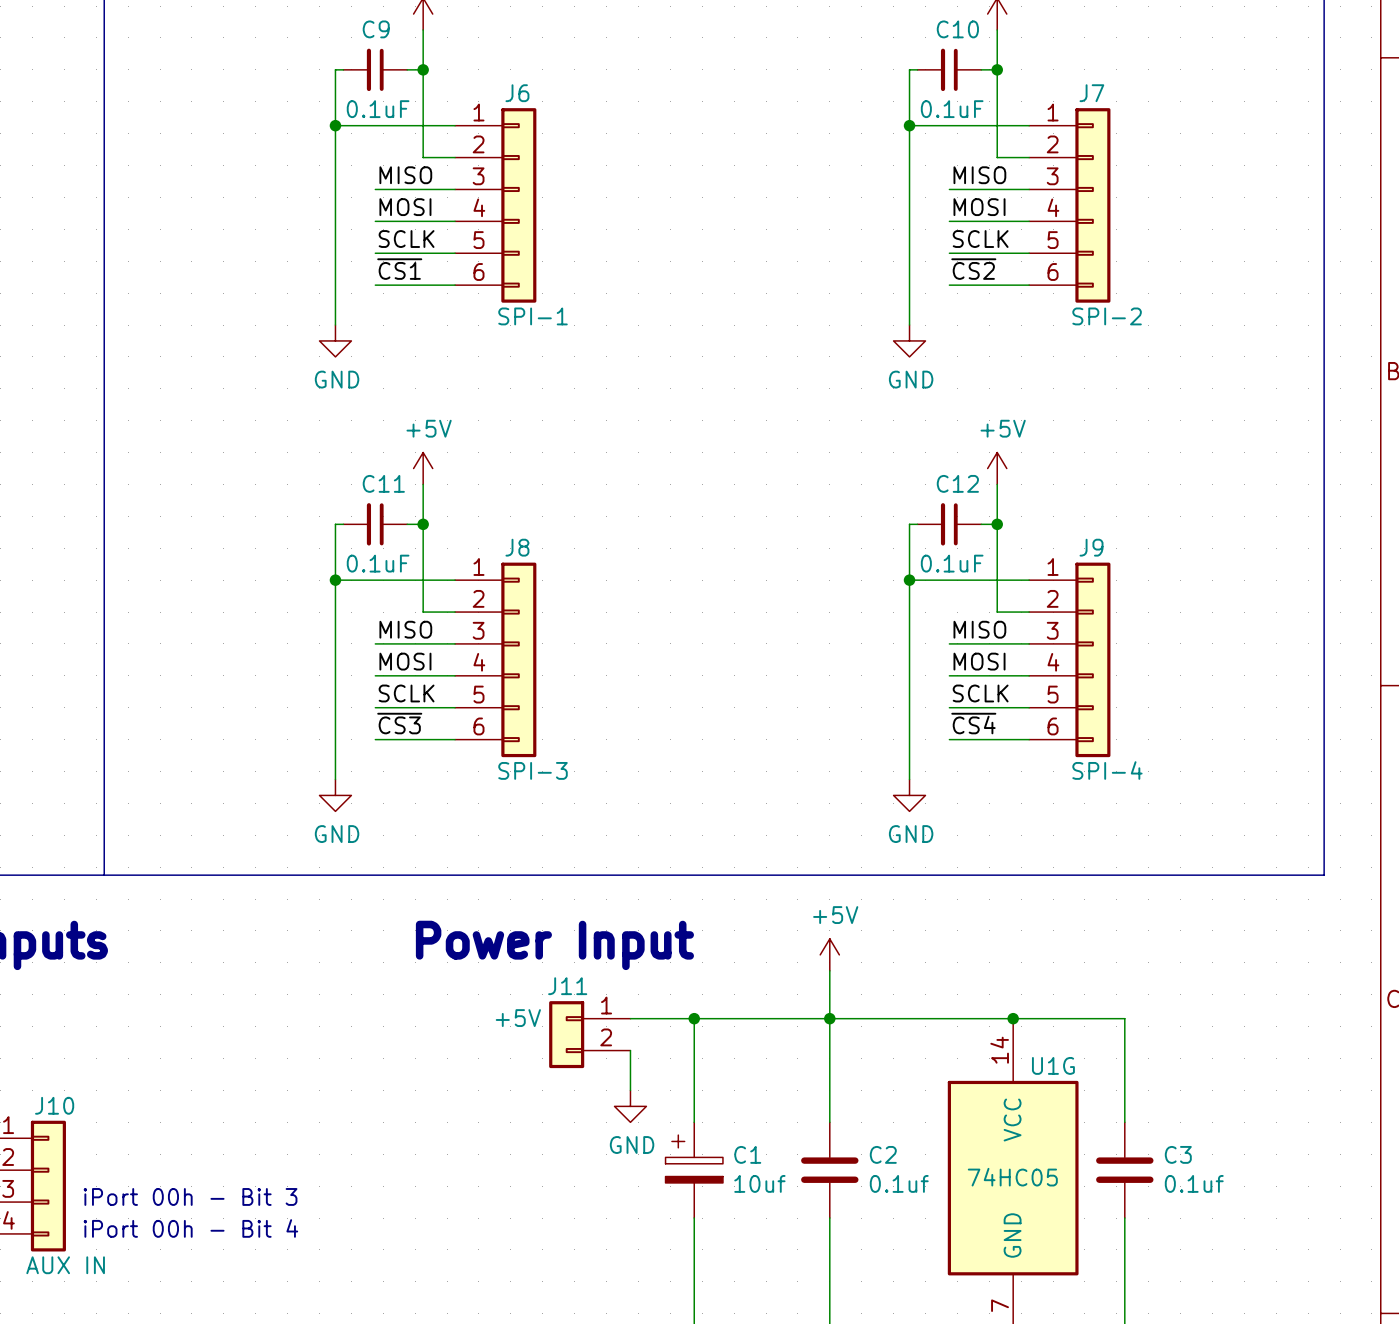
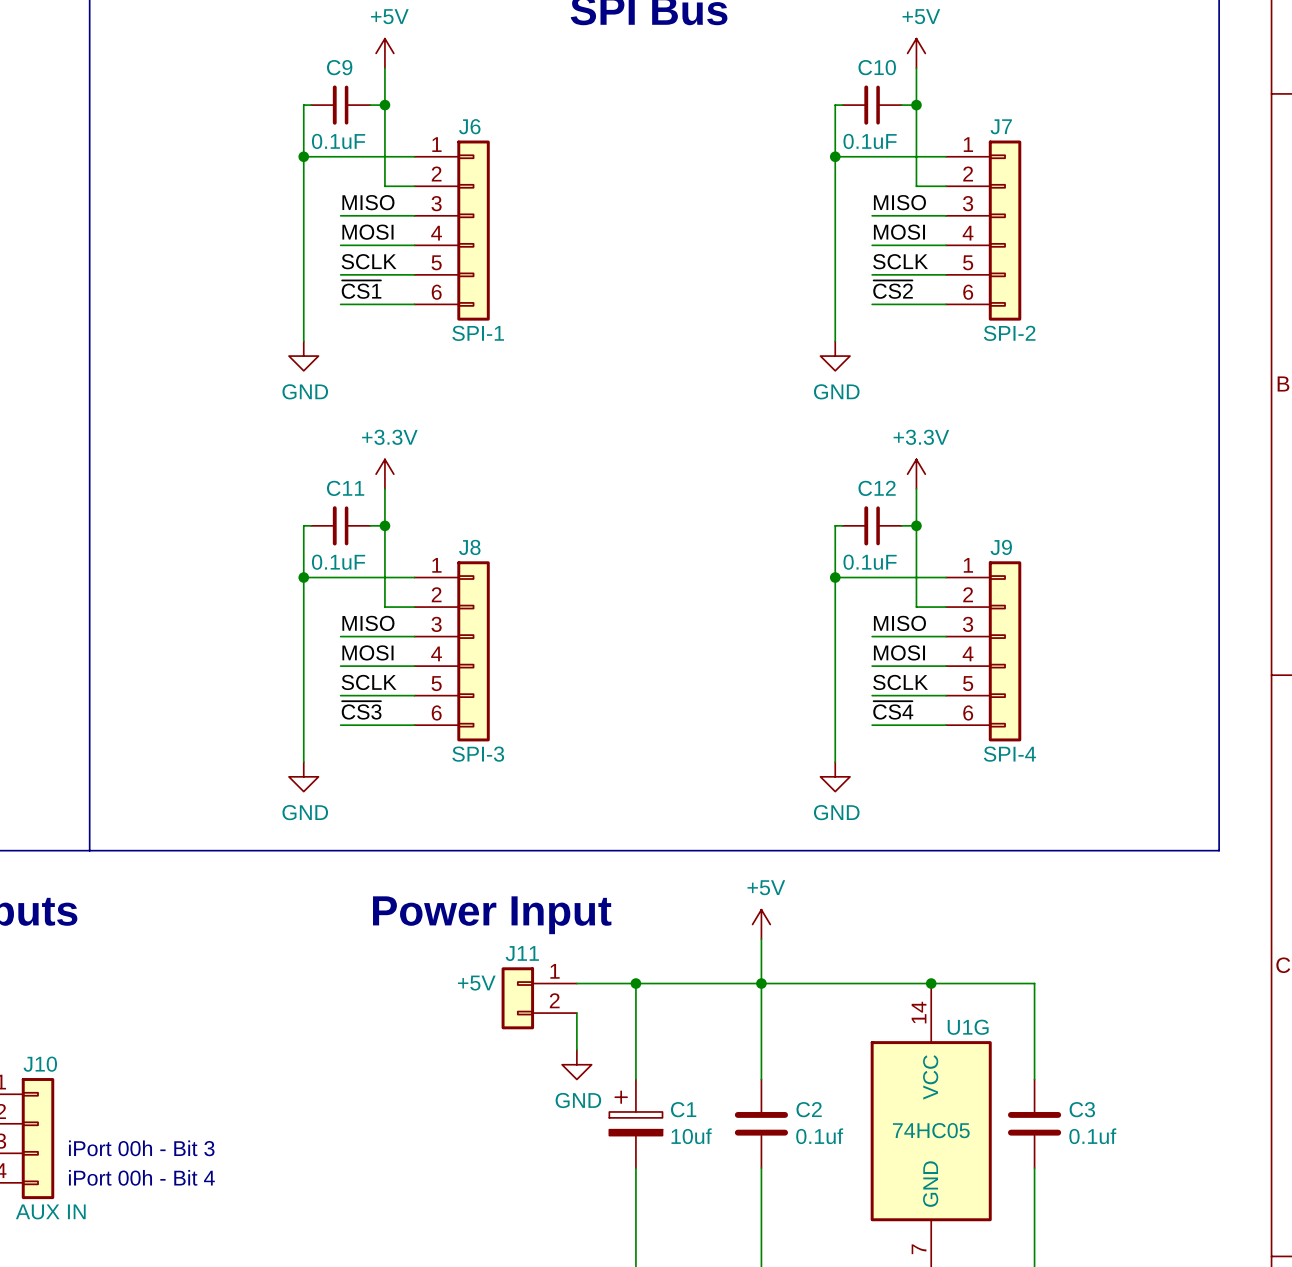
power symbol: +5V (423, 468) -> +3.3V (384, 474)
power symbol: +5V (997, 468) -> +3.3V (916, 474)

